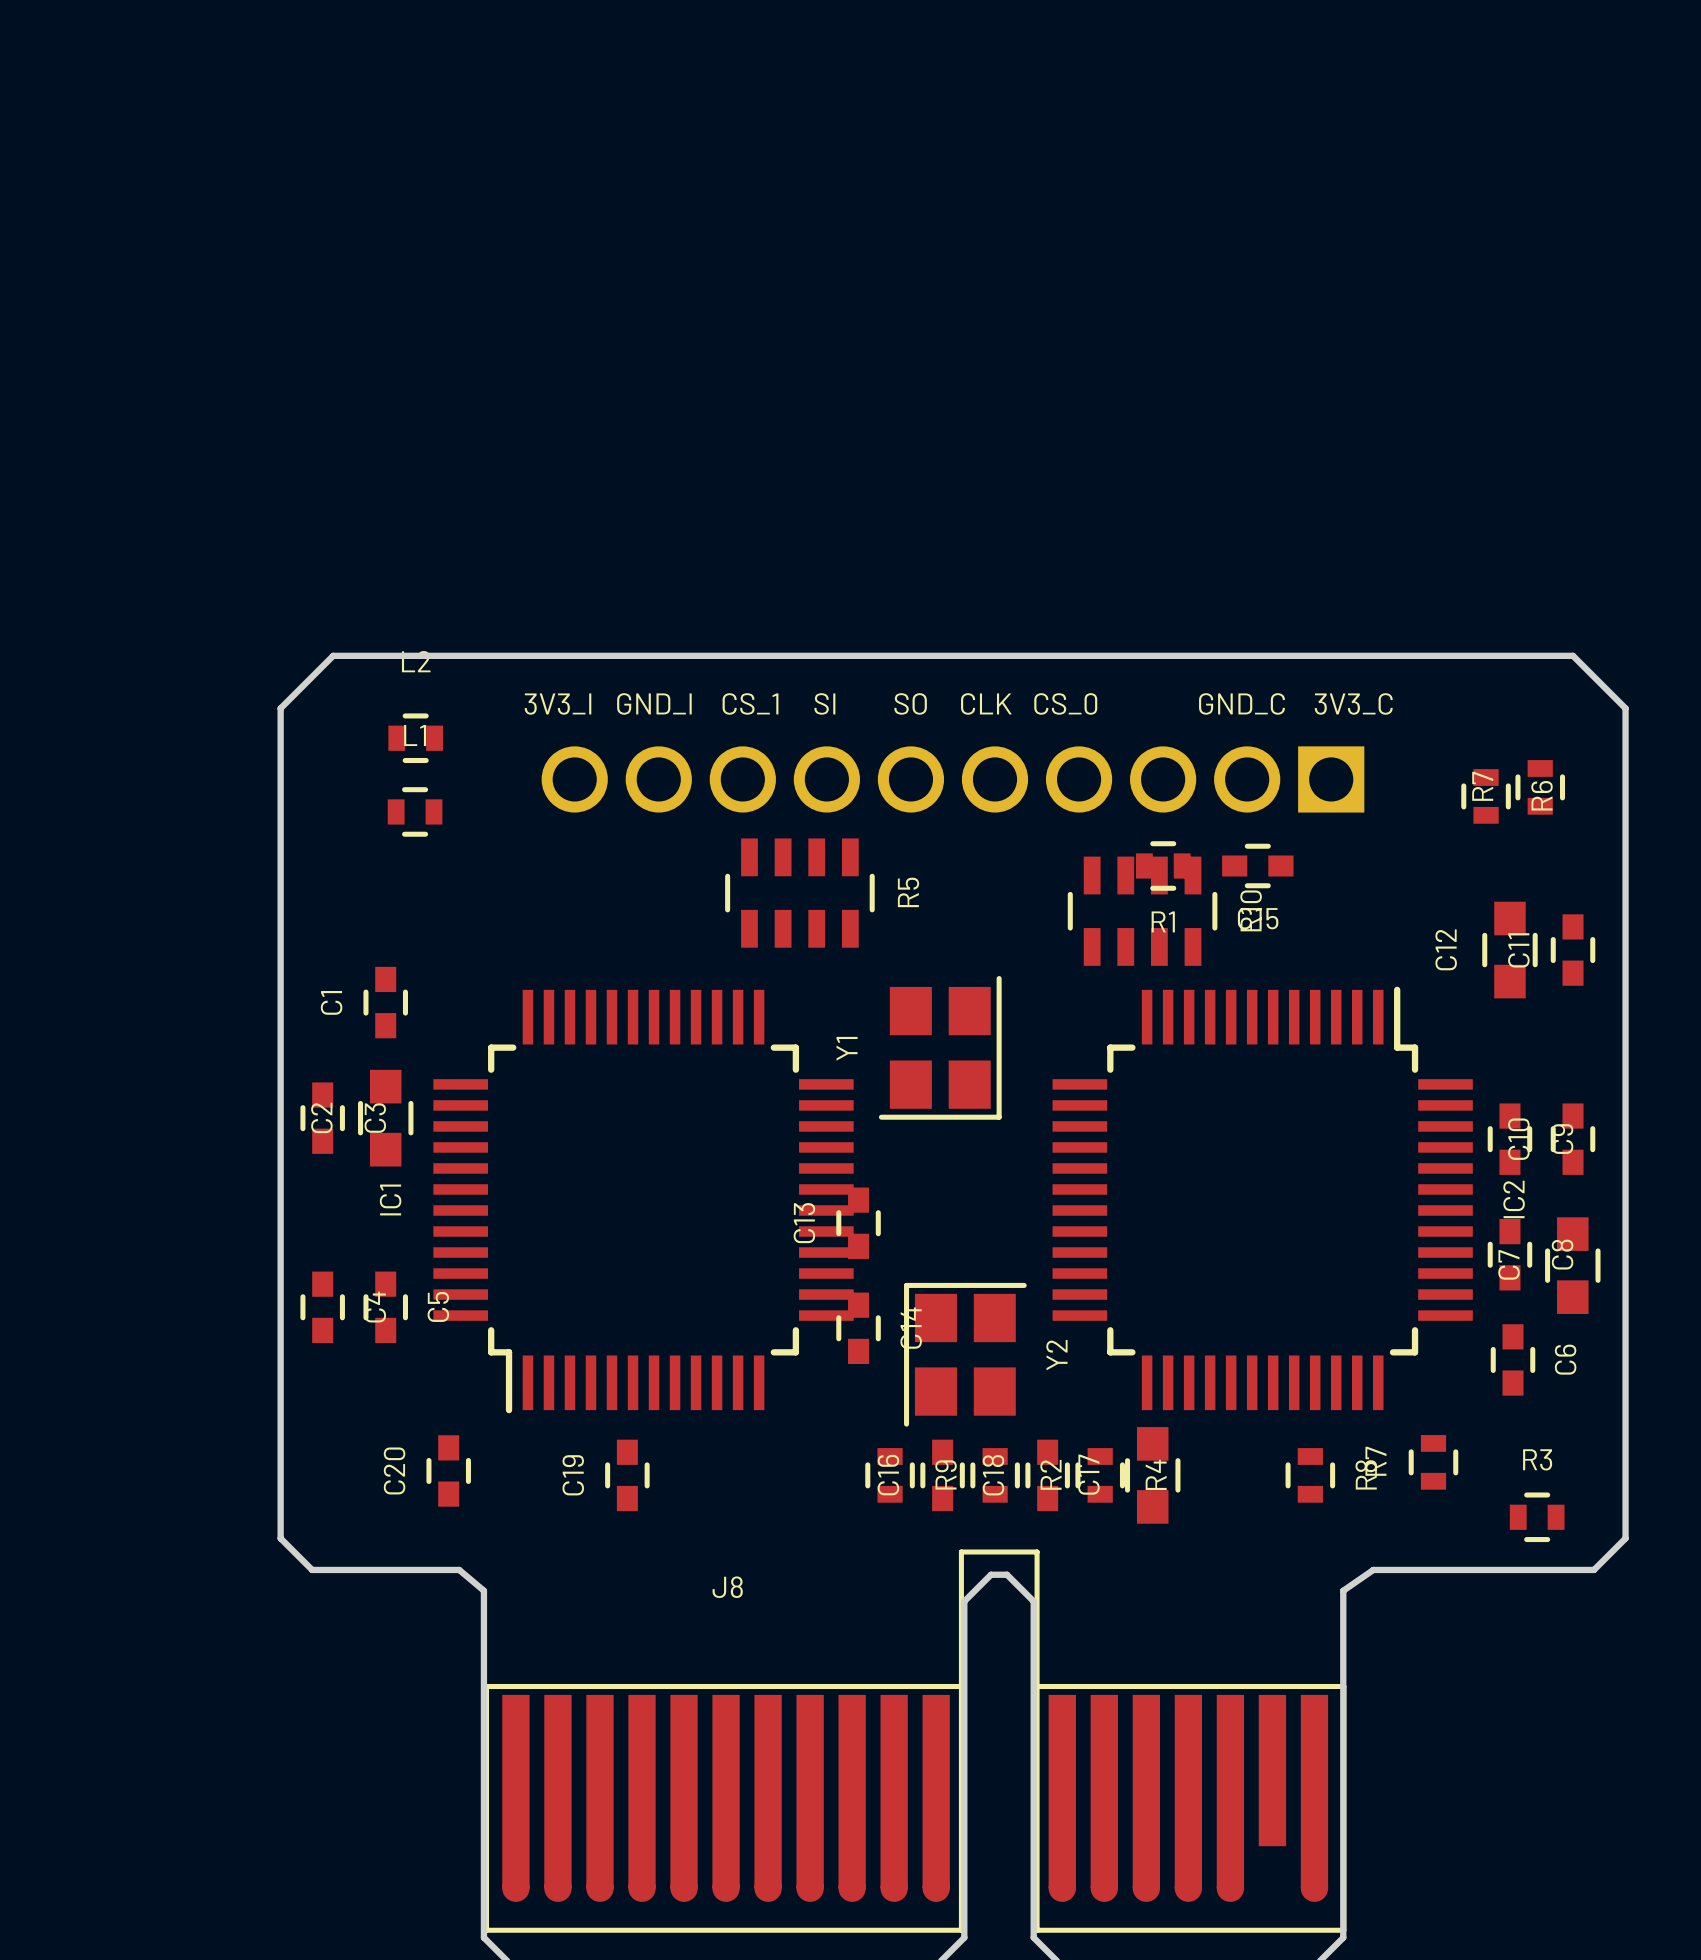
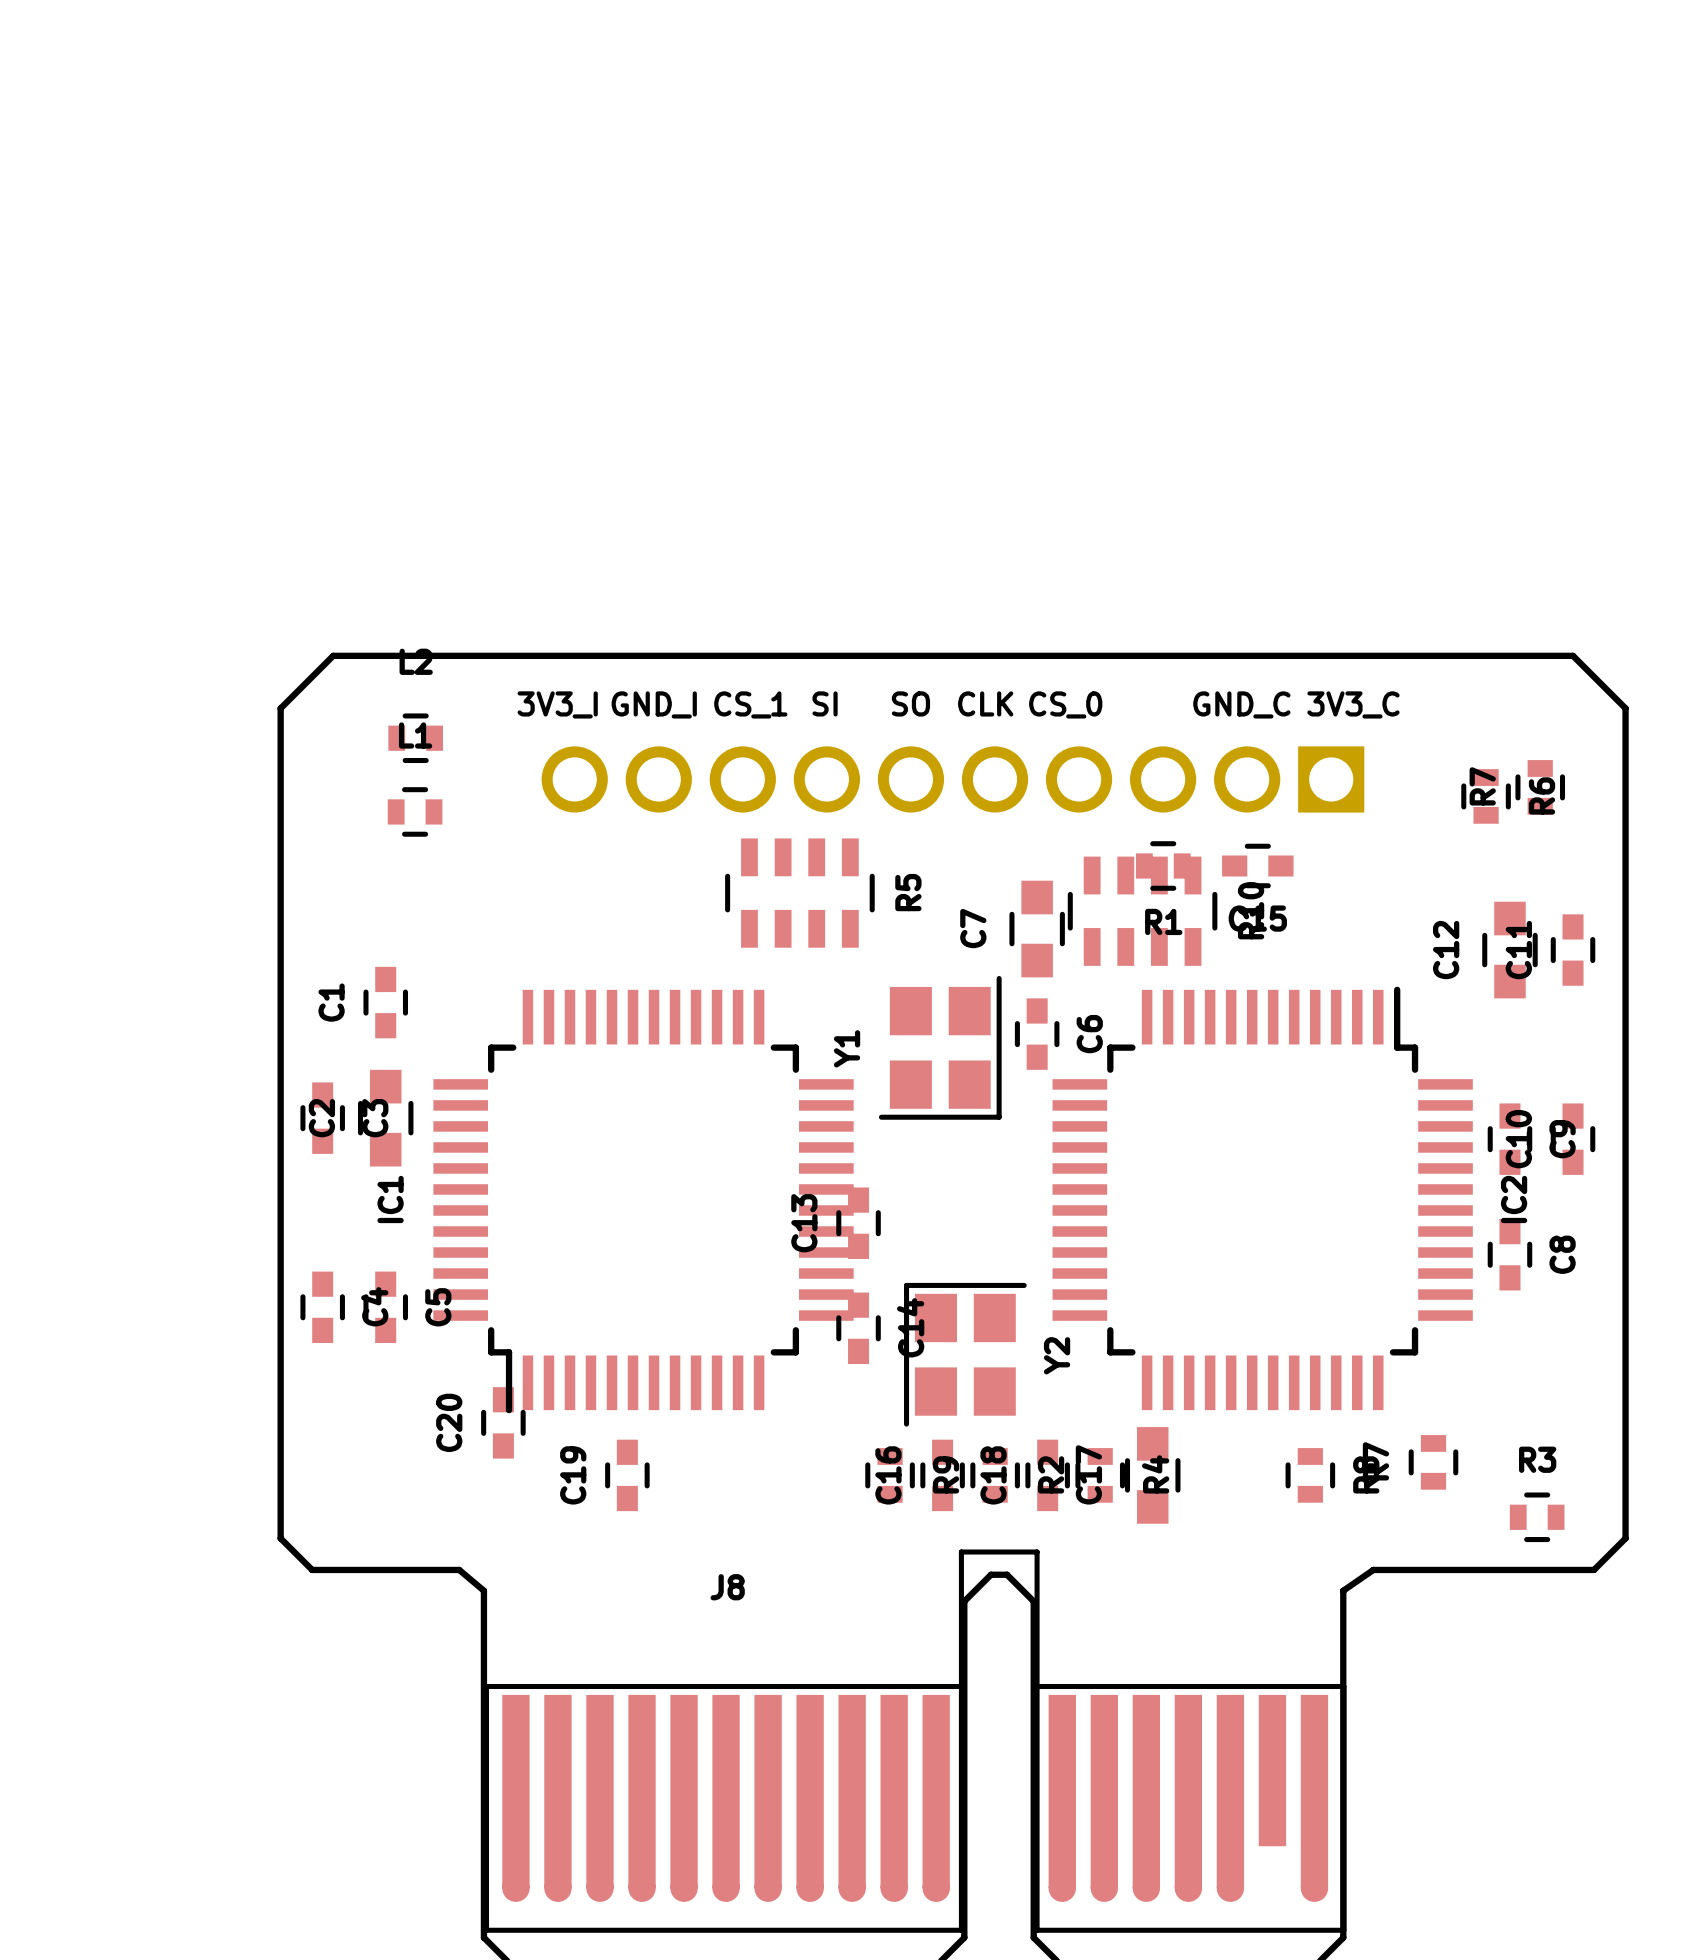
C7 position: (1572, 1265) -> (1037, 929)
C6 position: (1513, 1359) -> (1037, 1034)
C20 position: (448, 1470) -> (503, 1422)

